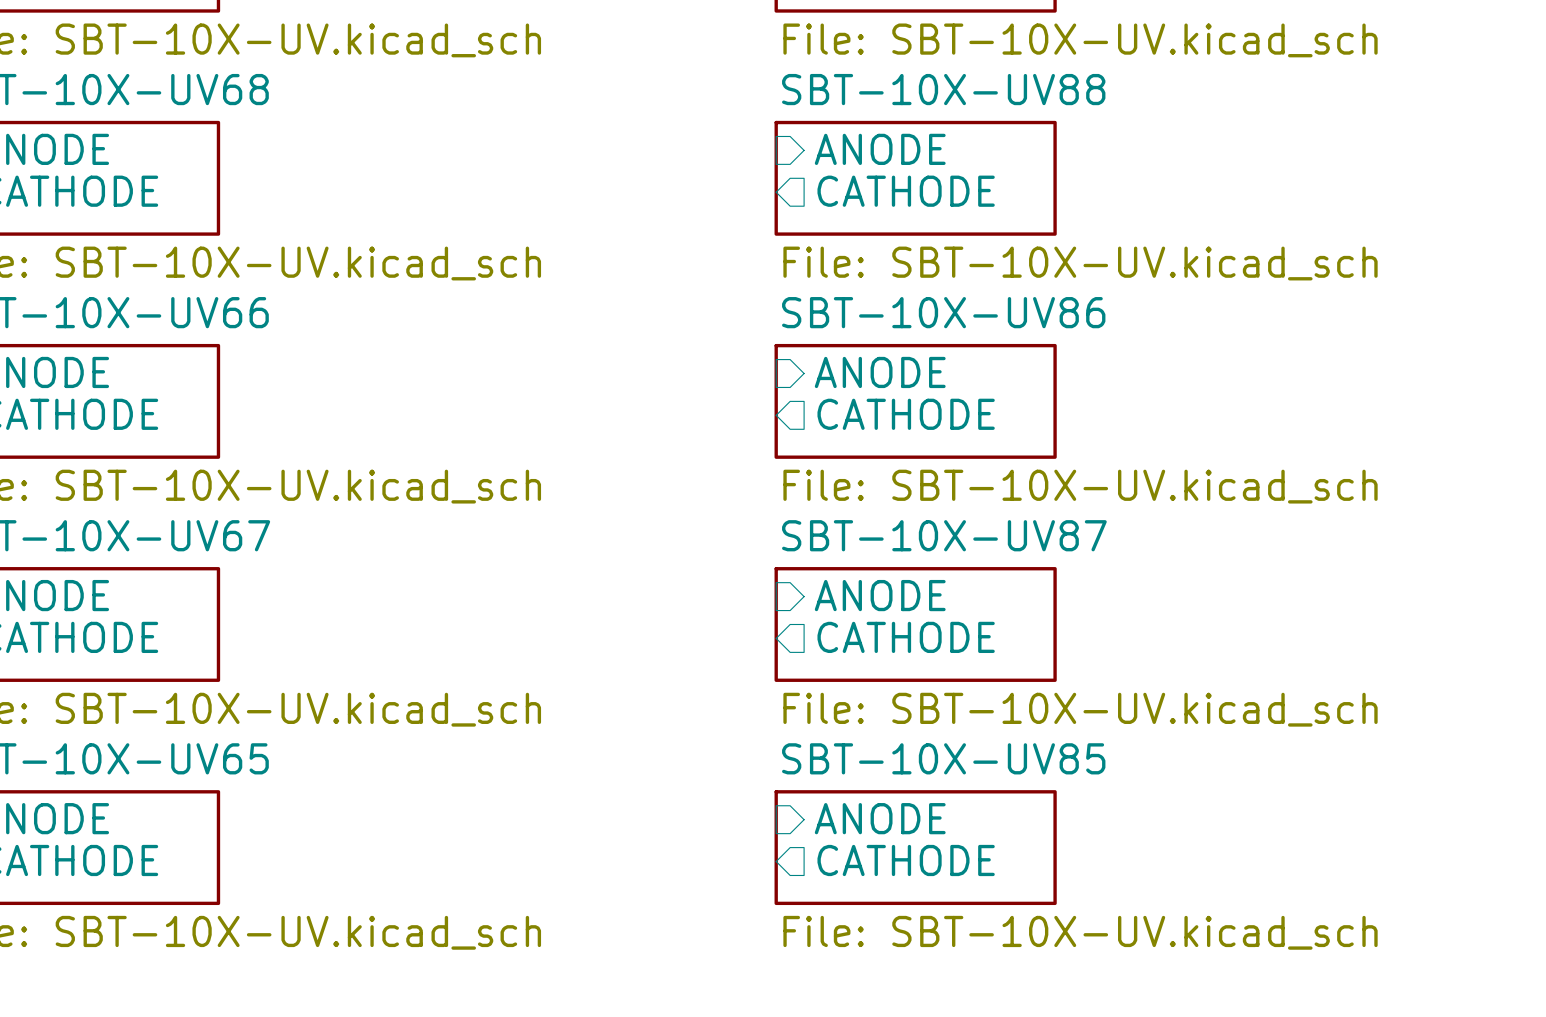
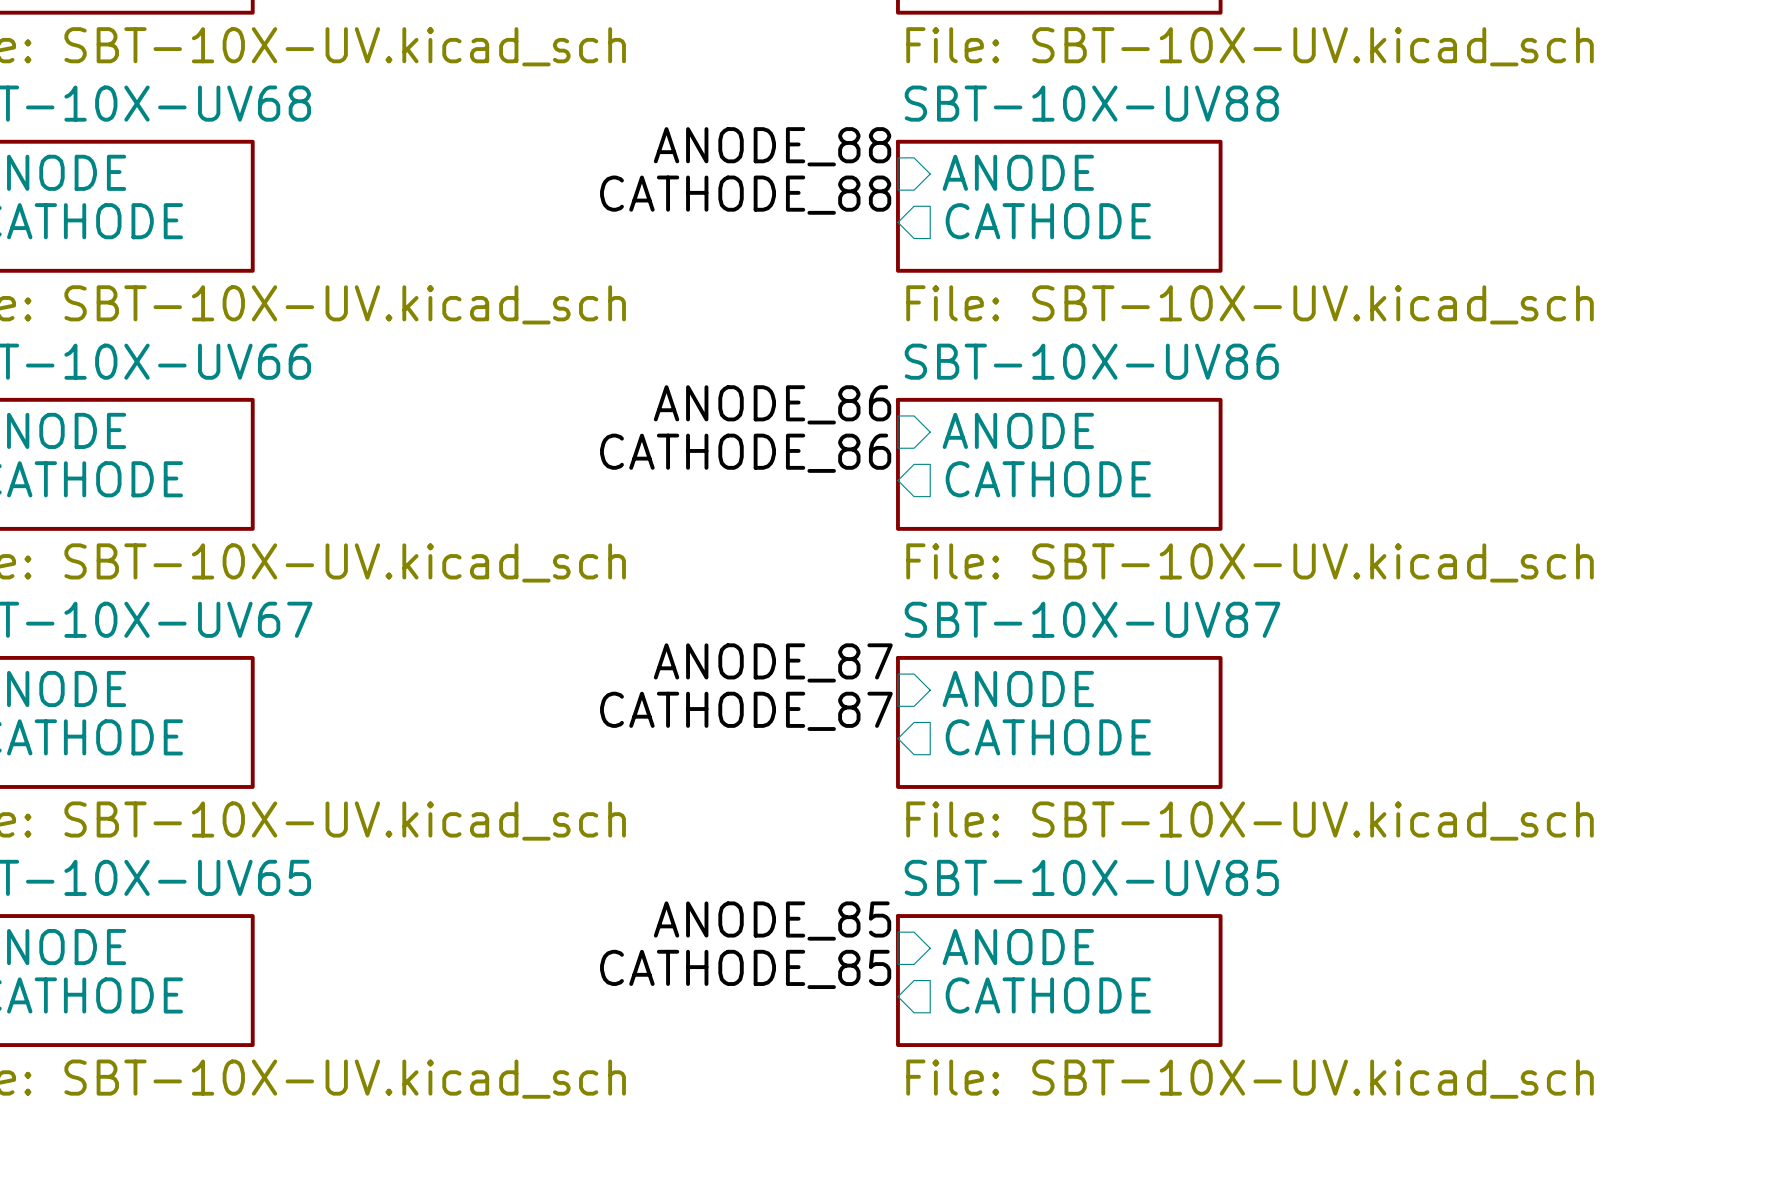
label: none -> ANODE_88 (772, 146)
label: none -> CATHODE_88 (745, 195)
label: none -> ANODE_86 (772, 404)
label: none -> CATHODE_86 (745, 453)
label: none -> ANODE_87 (773, 662)
label: none -> CATHODE_87 (746, 711)
label: none -> ANODE_85 (772, 921)
label: none -> CATHODE_85 (745, 969)

